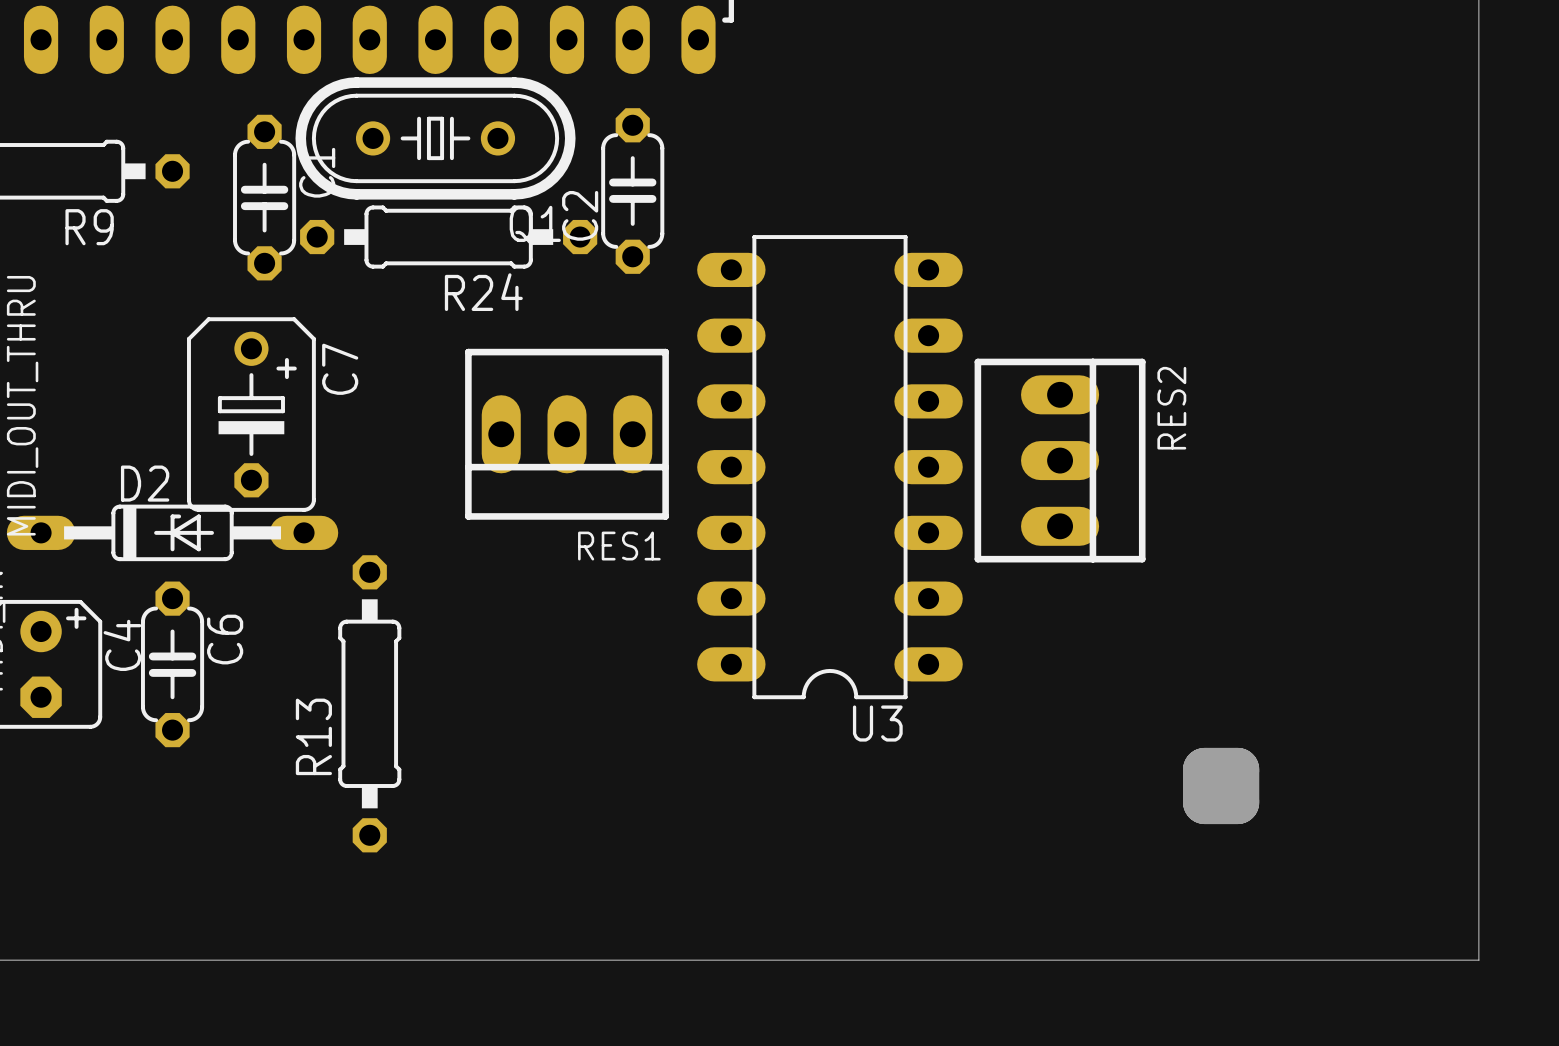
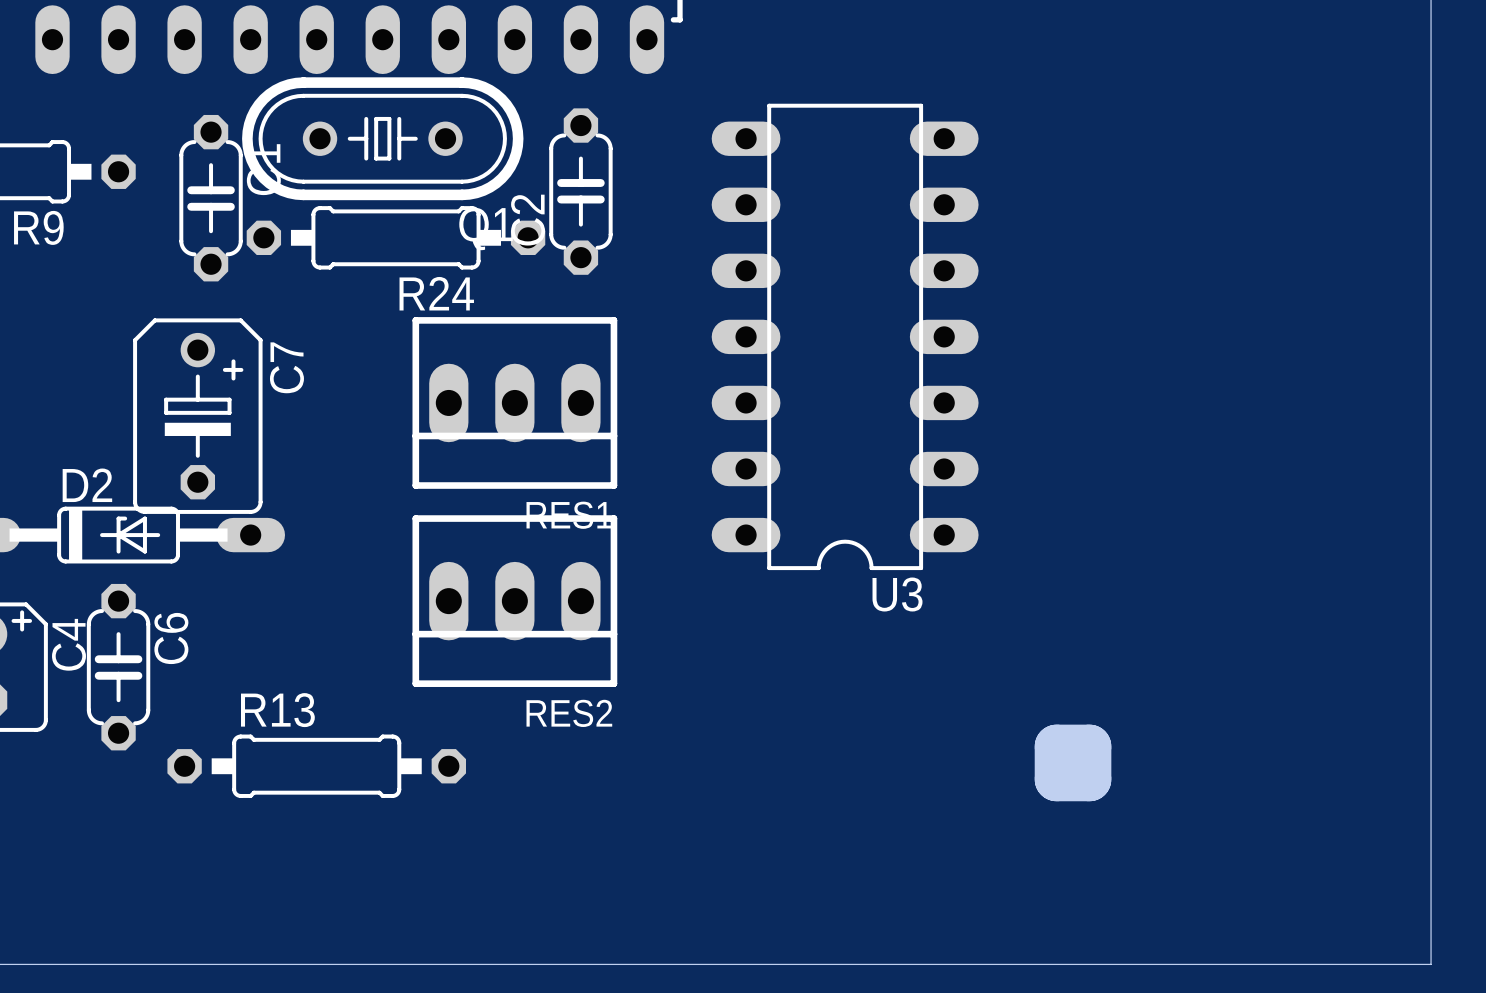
RES1 position: (566, 434) -> (514, 402)
RES2 rotation: 0° (1060, 460) -> 90° clockwise (514, 601)
RES2 position: (1060, 460) -> (514, 601)
U3 position: (829, 467) -> (845, 336)
R13 rotation: 0° (369, 703) -> 90° clockwise (316, 766)
board edge: (1204, 769) (1237, 769) (1237, 802) (1204, 802) (1204, 769) -> (1056, 746) (1089, 746) (1089, 779) (1056, 779) (1056, 746)

